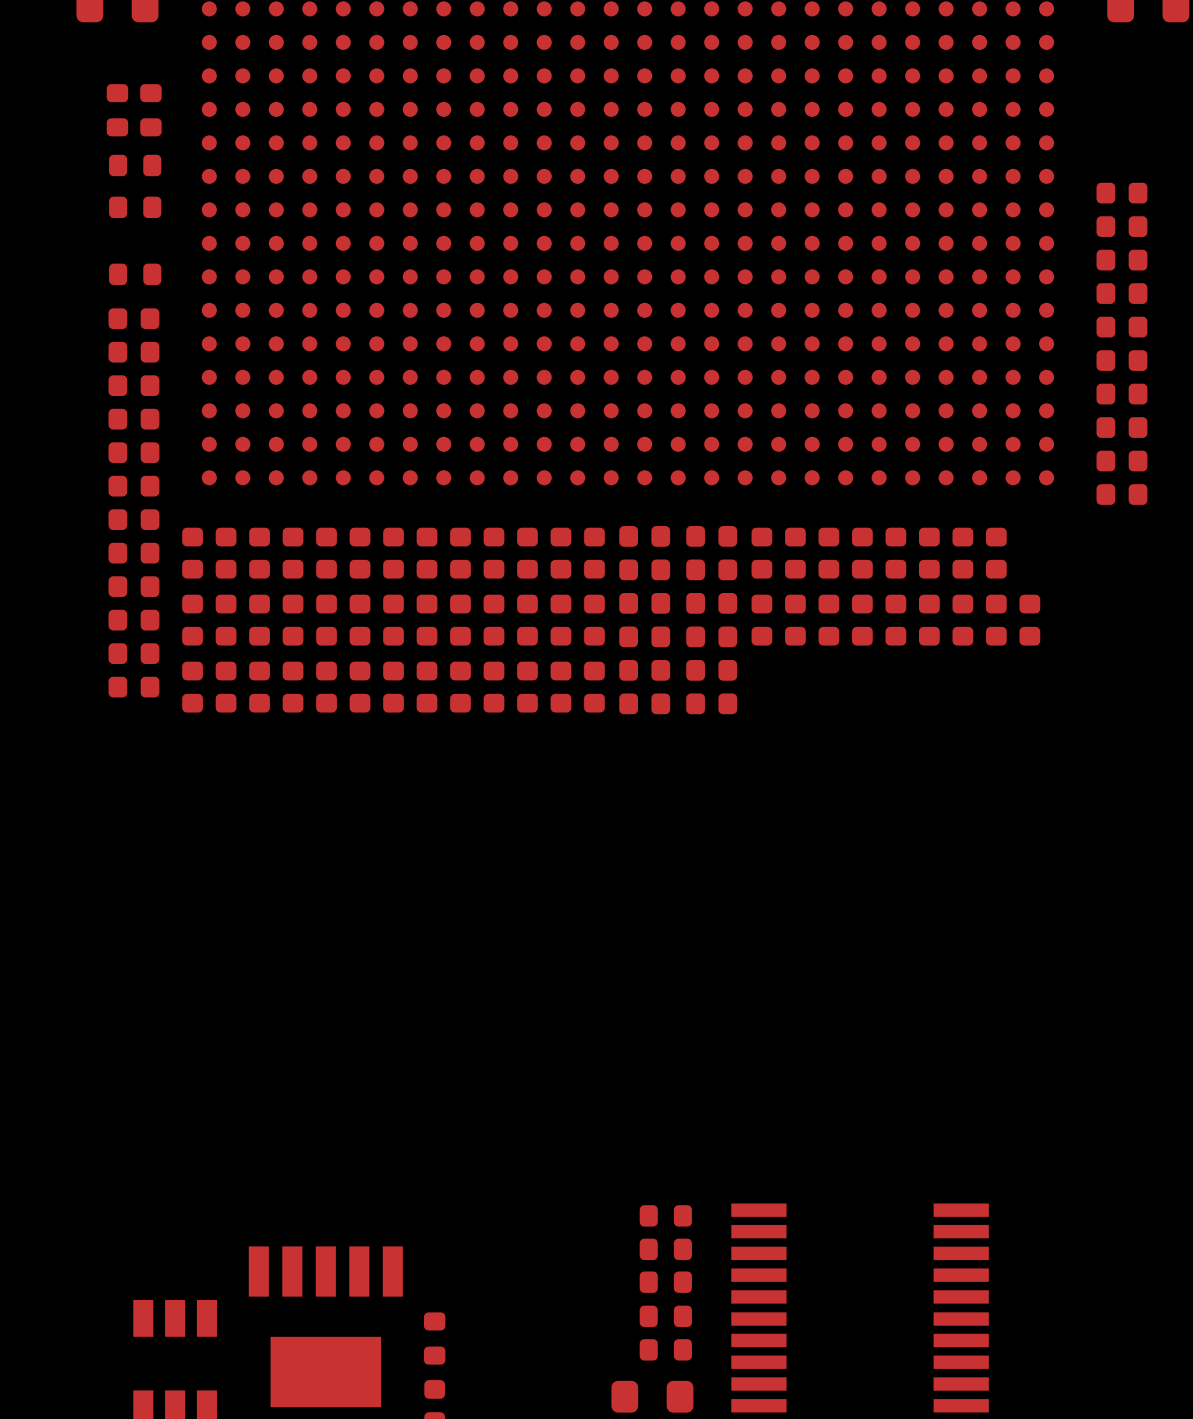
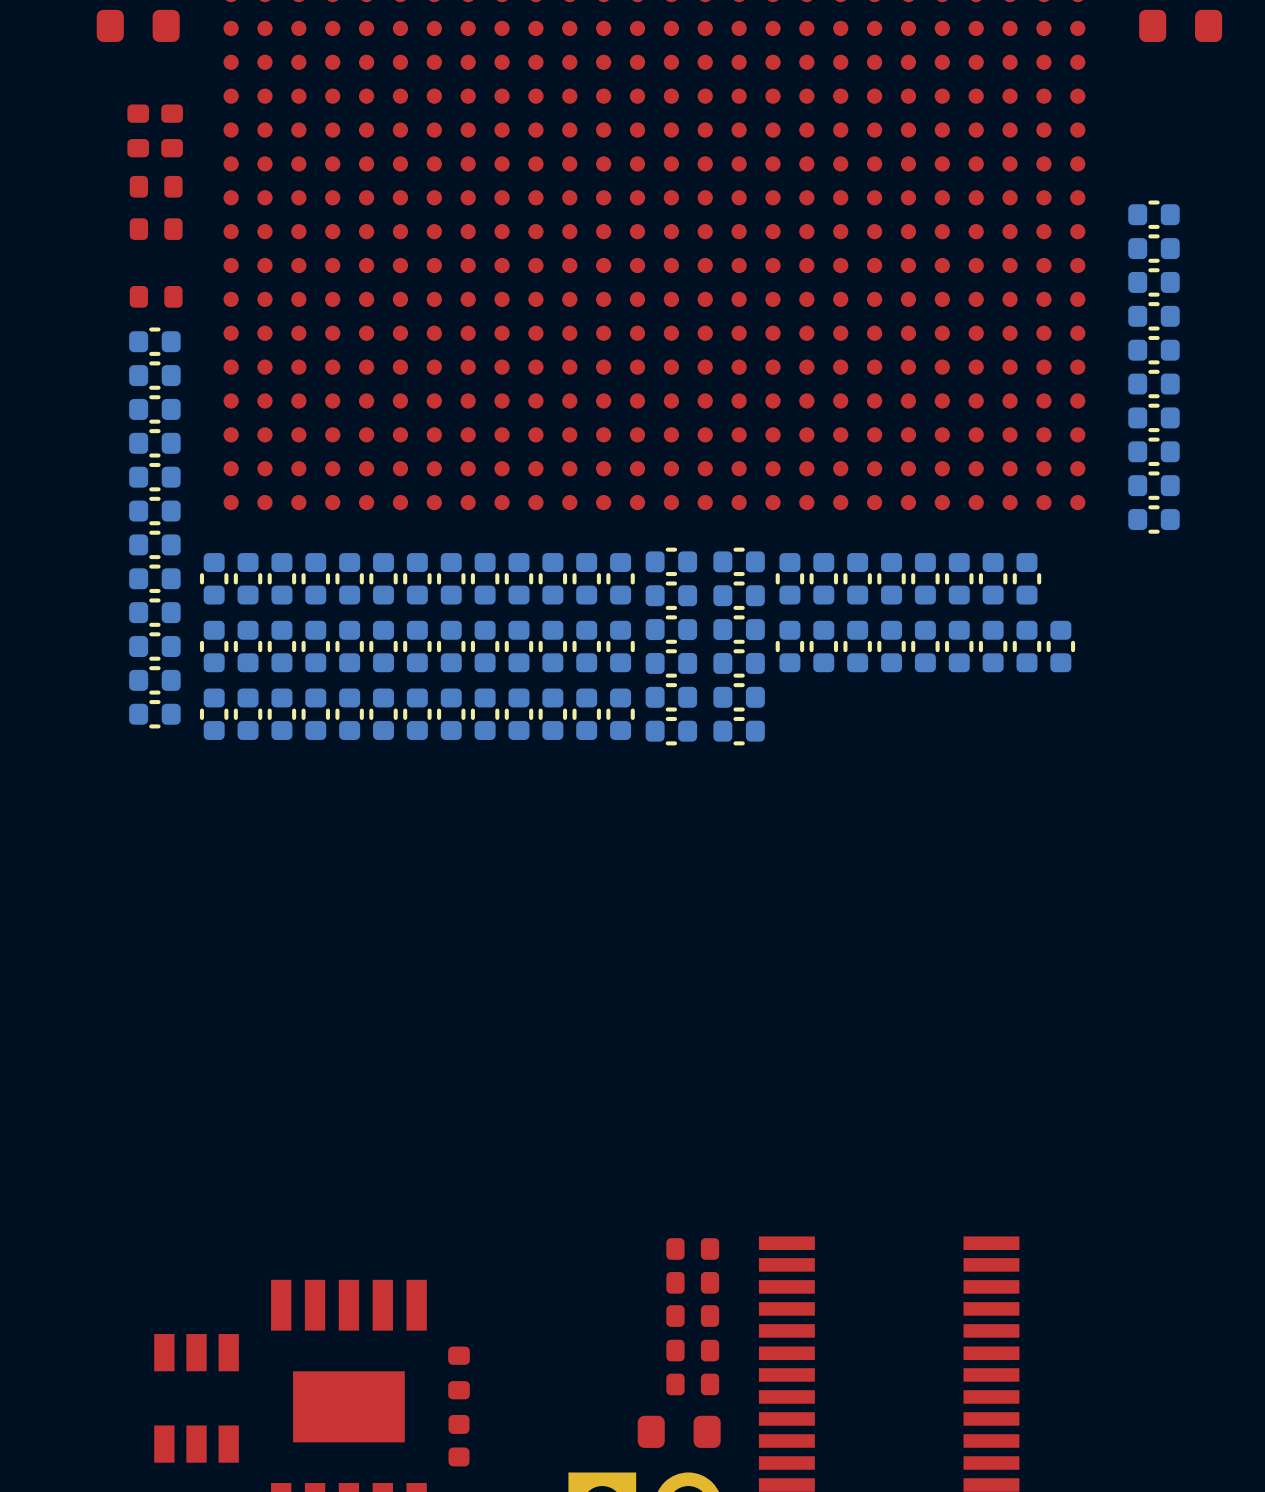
part side: top (1121, 193) -> bottom (1153, 214)
part side: top (1121, 226) -> bottom (1153, 248)
part side: top (1121, 260) -> bottom (1153, 282)
part side: top (1121, 293) -> bottom (1153, 316)
part side: top (133, 318) -> bottom (154, 341)
part side: top (1121, 327) -> bottom (1153, 350)
part side: top (133, 352) -> bottom (154, 375)
part side: top (1121, 360) -> bottom (1153, 384)
part side: top (133, 385) -> bottom (154, 409)
part side: top (1121, 394) -> bottom (1153, 417)
part side: top (133, 419) -> bottom (154, 443)
part side: top (1121, 427) -> bottom (1153, 451)
part side: top (133, 452) -> bottom (154, 477)
part side: top (1121, 461) -> bottom (1153, 485)
part side: top (133, 486) -> bottom (154, 511)
part side: top (1121, 494) -> bottom (1153, 519)
part side: top (133, 519) -> bottom (154, 544)
part side: top (644, 536) -> bottom (671, 561)
part side: top (711, 536) -> bottom (739, 561)
part side: top (133, 553) -> bottom (154, 578)
part side: top (192, 553) -> bottom (214, 578)
part side: top (226, 553) -> bottom (248, 578)
part side: top (259, 553) -> bottom (281, 578)
part side: top (293, 553) -> bottom (315, 578)
part side: top (326, 553) -> bottom (349, 578)
part side: top (360, 553) -> bottom (383, 578)
part side: top (393, 553) -> bottom (417, 578)
part side: top (427, 553) -> bottom (451, 578)
part side: top (460, 553) -> bottom (485, 578)
part side: top (493, 553) -> bottom (518, 578)
part side: top (527, 553) -> bottom (552, 578)
part side: top (560, 553) -> bottom (586, 578)
part side: top (594, 553) -> bottom (620, 578)
part side: top (761, 553) -> bottom (789, 578)
part side: top (795, 553) -> bottom (823, 578)
part side: top (828, 553) -> bottom (857, 578)
part side: top (862, 553) -> bottom (891, 578)
part side: top (895, 553) -> bottom (925, 578)
part side: top (929, 553) -> bottom (959, 578)
part side: top (962, 553) -> bottom (993, 578)
part side: top (996, 553) -> bottom (1026, 578)
part side: top (644, 569) -> bottom (671, 595)
part side: top (711, 569) -> bottom (739, 595)
part side: top (133, 586) -> bottom (154, 612)
part side: top (644, 603) -> bottom (671, 629)
part side: top (711, 603) -> bottom (739, 629)
part side: top (133, 620) -> bottom (154, 646)
part side: top (192, 620) -> bottom (214, 646)
part side: top (226, 620) -> bottom (248, 646)
part side: top (259, 620) -> bottom (281, 646)
part side: top (293, 620) -> bottom (315, 646)
part side: top (326, 620) -> bottom (349, 646)
part side: top (360, 620) -> bottom (383, 646)
part side: top (393, 620) -> bottom (417, 646)
part side: top (427, 620) -> bottom (451, 646)
part side: top (460, 620) -> bottom (485, 646)
part side: top (493, 620) -> bottom (518, 646)
part side: top (527, 620) -> bottom (552, 646)
part side: top (560, 620) -> bottom (586, 646)
part side: top (594, 620) -> bottom (620, 646)
part side: top (761, 620) -> bottom (789, 646)
part side: top (795, 620) -> bottom (823, 646)
part side: top (828, 620) -> bottom (857, 646)
part side: top (862, 620) -> bottom (891, 646)
part side: top (895, 620) -> bottom (925, 646)
part side: top (929, 620) -> bottom (959, 646)
part side: top (962, 620) -> bottom (993, 646)
part side: top (996, 620) -> bottom (1026, 646)
part side: top (1029, 620) -> bottom (1060, 646)
part side: top (644, 636) -> bottom (671, 663)
part side: top (711, 636) -> bottom (739, 663)
part side: top (133, 653) -> bottom (154, 680)
part side: top (644, 670) -> bottom (671, 697)
part side: top (711, 670) -> bottom (739, 697)
part side: top (133, 687) -> bottom (154, 714)
part side: top (192, 687) -> bottom (214, 714)
part side: top (226, 687) -> bottom (248, 714)
part side: top (259, 687) -> bottom (281, 714)
part side: top (293, 687) -> bottom (315, 714)
part side: top (326, 687) -> bottom (349, 714)
part side: top (360, 687) -> bottom (383, 714)
part side: top (393, 687) -> bottom (417, 714)
part side: top (427, 687) -> bottom (451, 714)
part side: top (460, 687) -> bottom (485, 714)
part side: top (493, 687) -> bottom (518, 714)
part side: top (527, 687) -> bottom (552, 714)
part side: top (560, 687) -> bottom (586, 714)
part side: top (594, 687) -> bottom (620, 714)
part side: top (644, 703) -> bottom (671, 731)
part side: top (711, 703) -> bottom (739, 731)

